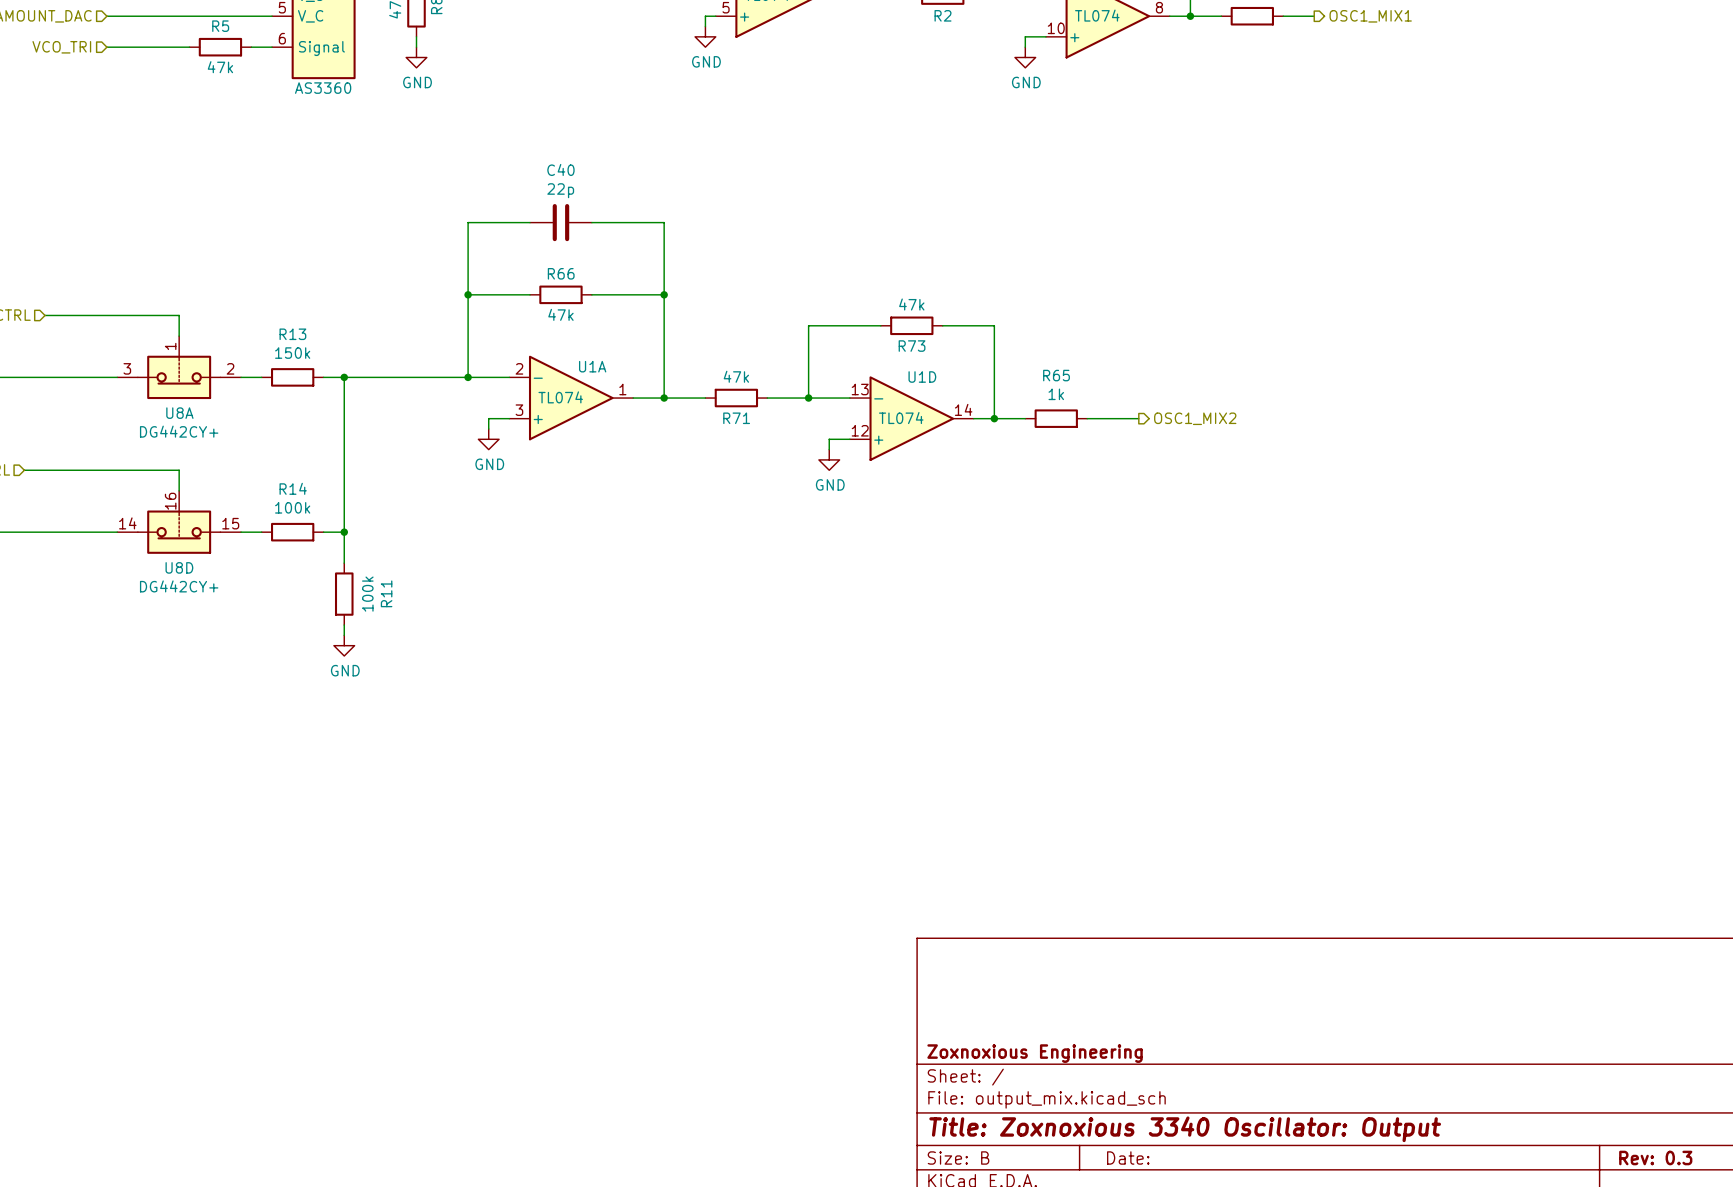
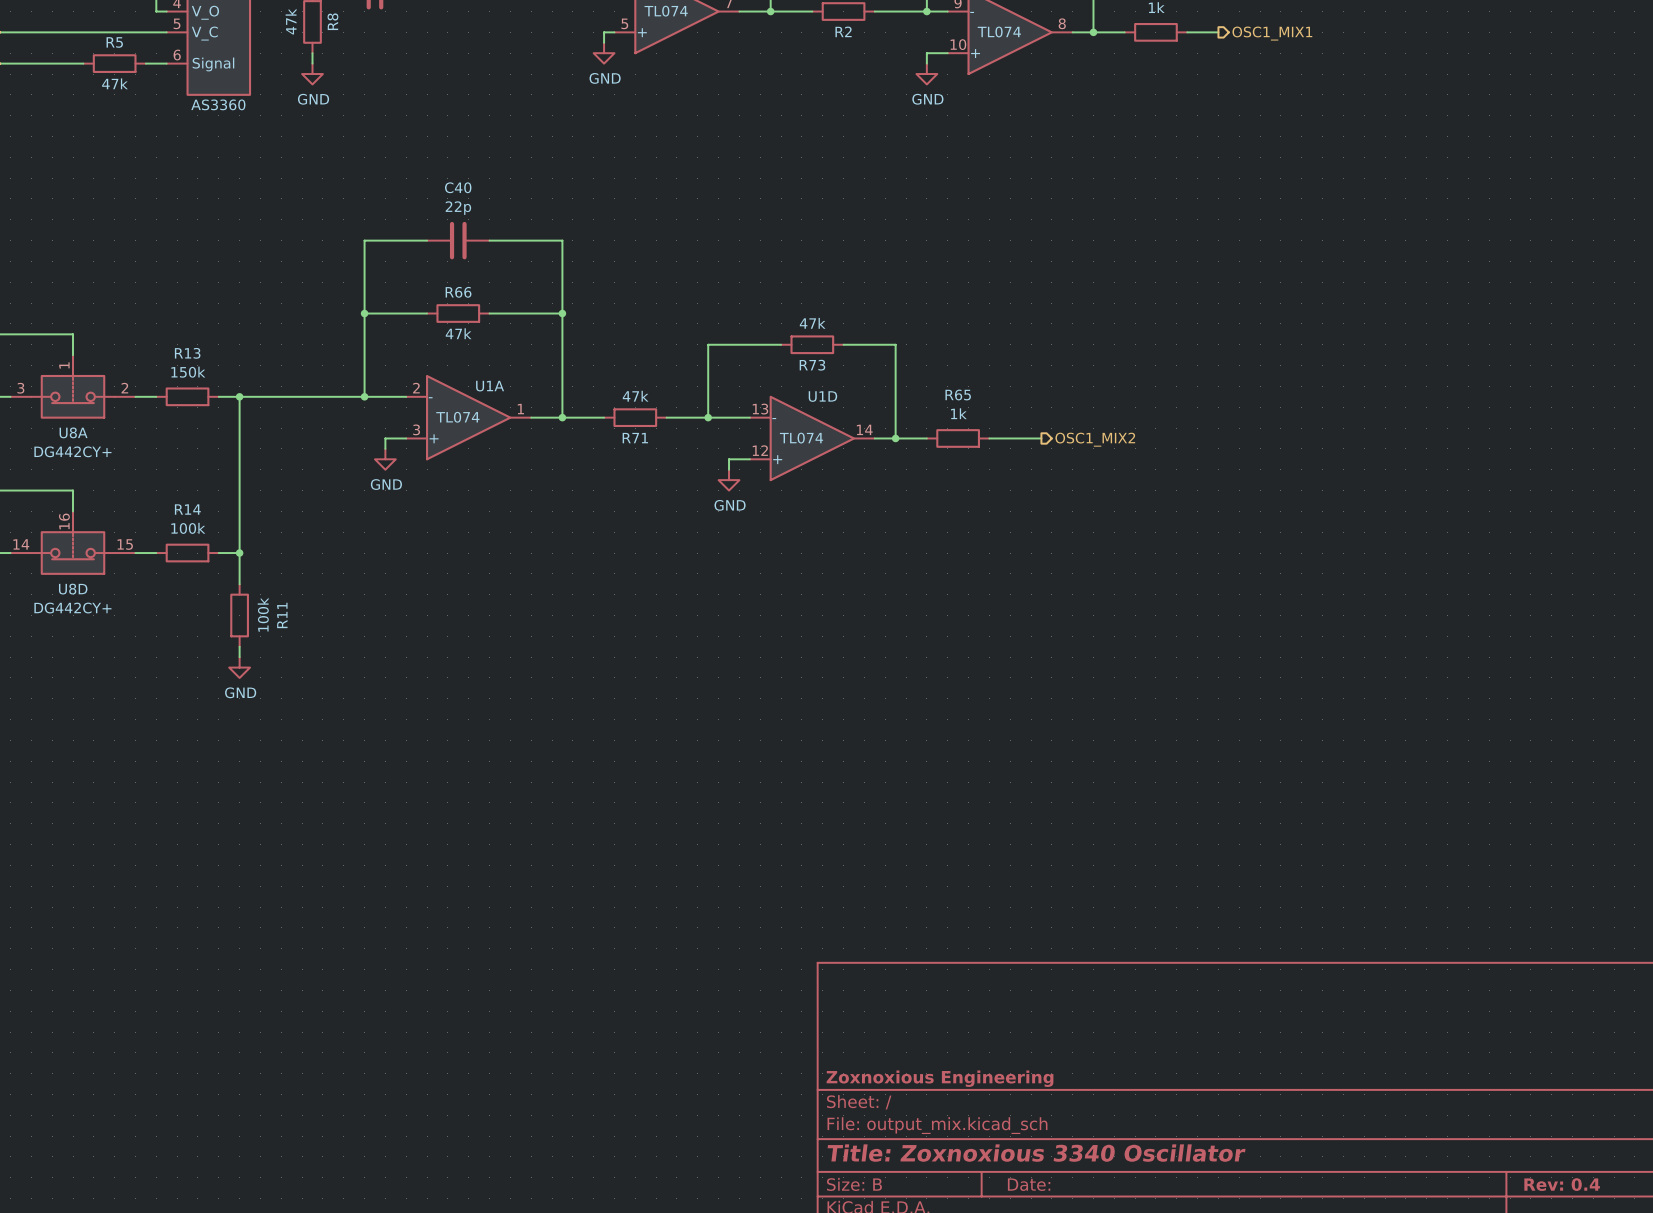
title block: Title: Zoxnoxious 3340 Oscillator: Output (1185, 1129) -> Title: Zoxnoxious 3340 Oscillator (1036, 1153)
title block: Rev: 0.3 (1655, 1158) -> Rev: 0.4 (1562, 1184)

